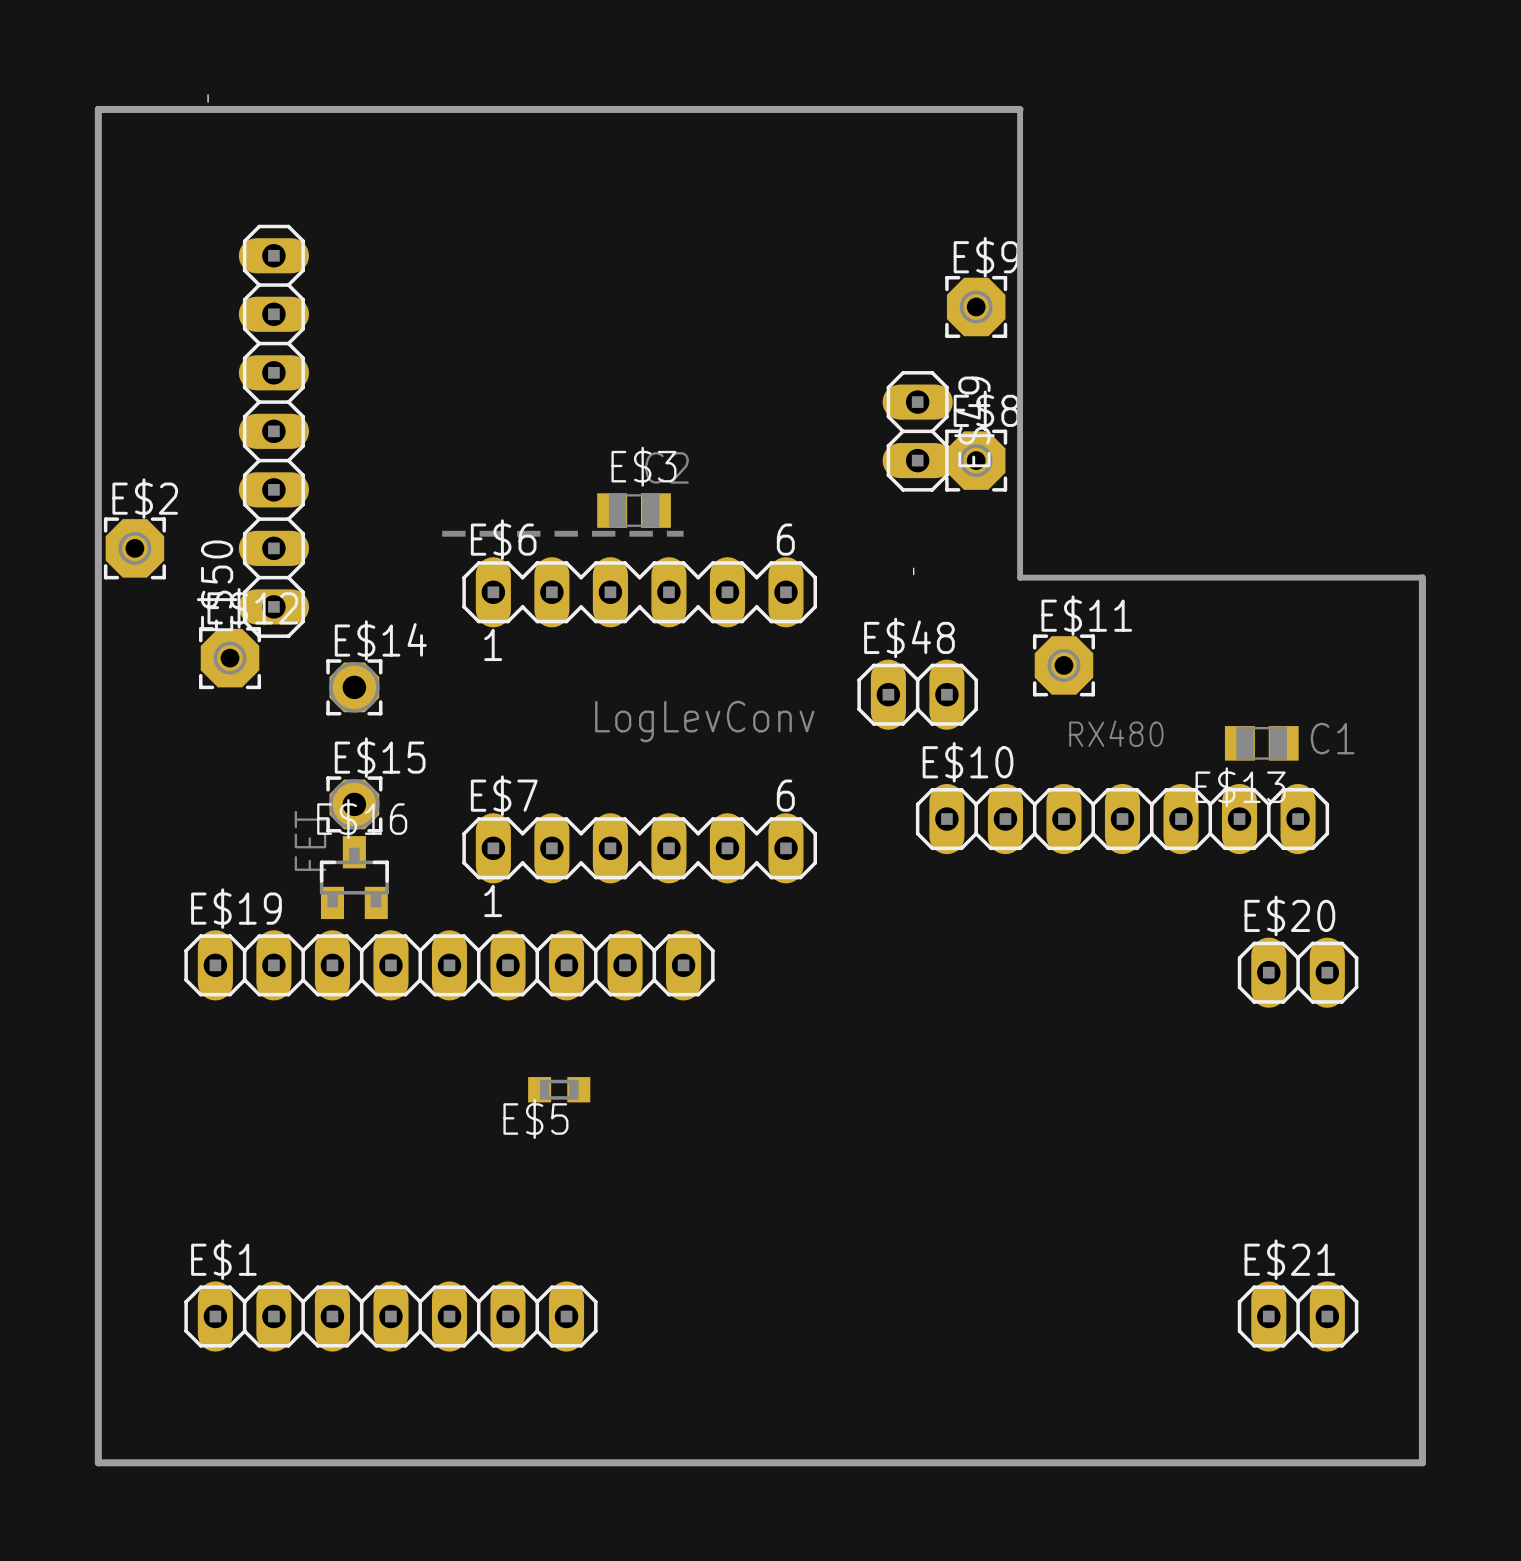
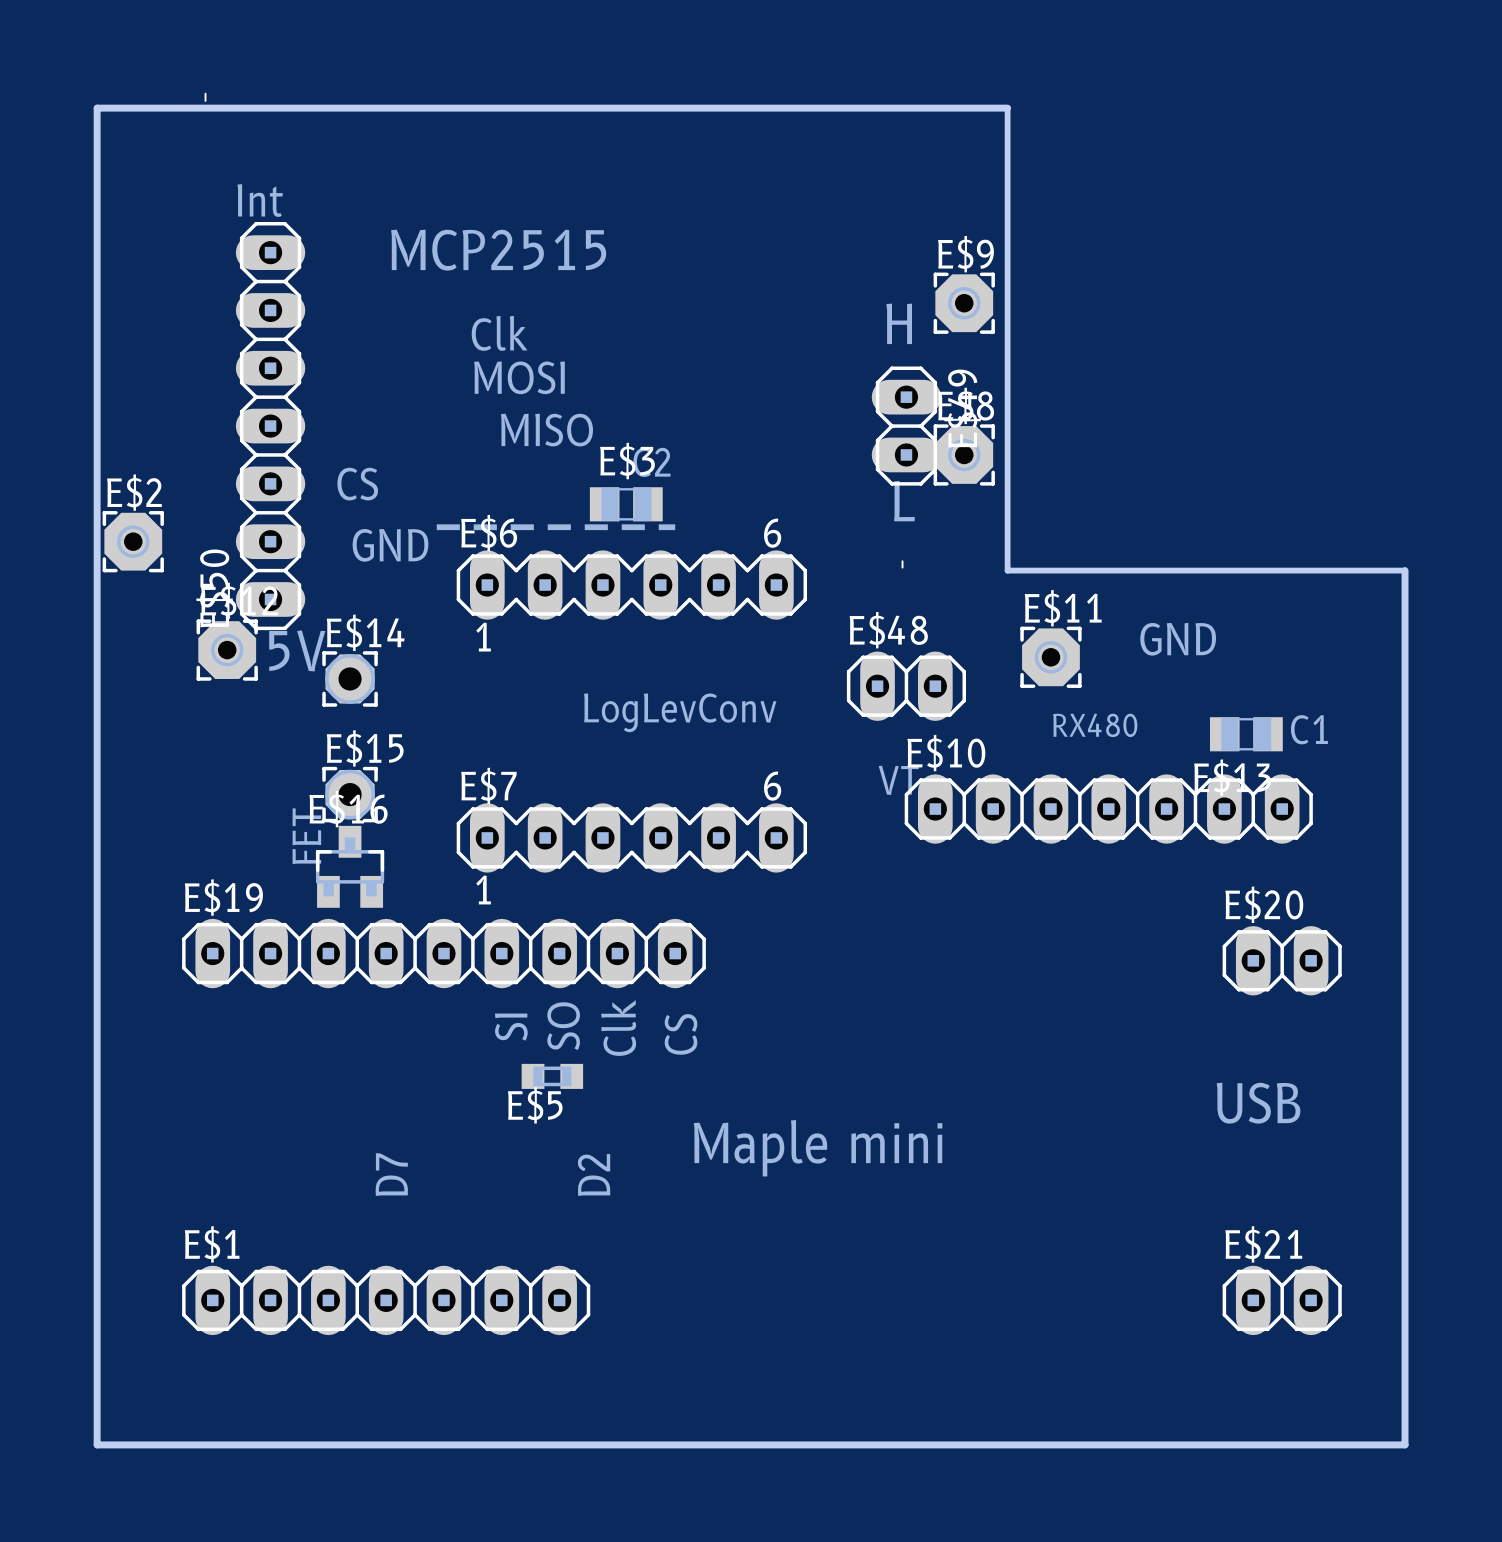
text: none -> Int (260, 200)
text: none -> MCP2515 (498, 250)
text: none -> H (899, 323)
text: none -> Clk (499, 333)
text: none -> MOSI (519, 377)
text: none -> MISO (546, 430)
text: none -> CS (357, 484)
text: none -> L (904, 501)
text: none -> GND (390, 545)
text: none -> GND (1178, 639)
text: none -> 5V (297, 650)
text: none -> VT (898, 780)
text: none -> SI (511, 1027)
text: none -> SO (563, 1026)
text: none -> Clk (618, 1028)
text: none -> CS (681, 1034)
text: none -> USB (1258, 1103)
text: none -> Maple mini (818, 1148)
text: none -> D7 (391, 1174)
text: none -> D2 (594, 1175)

